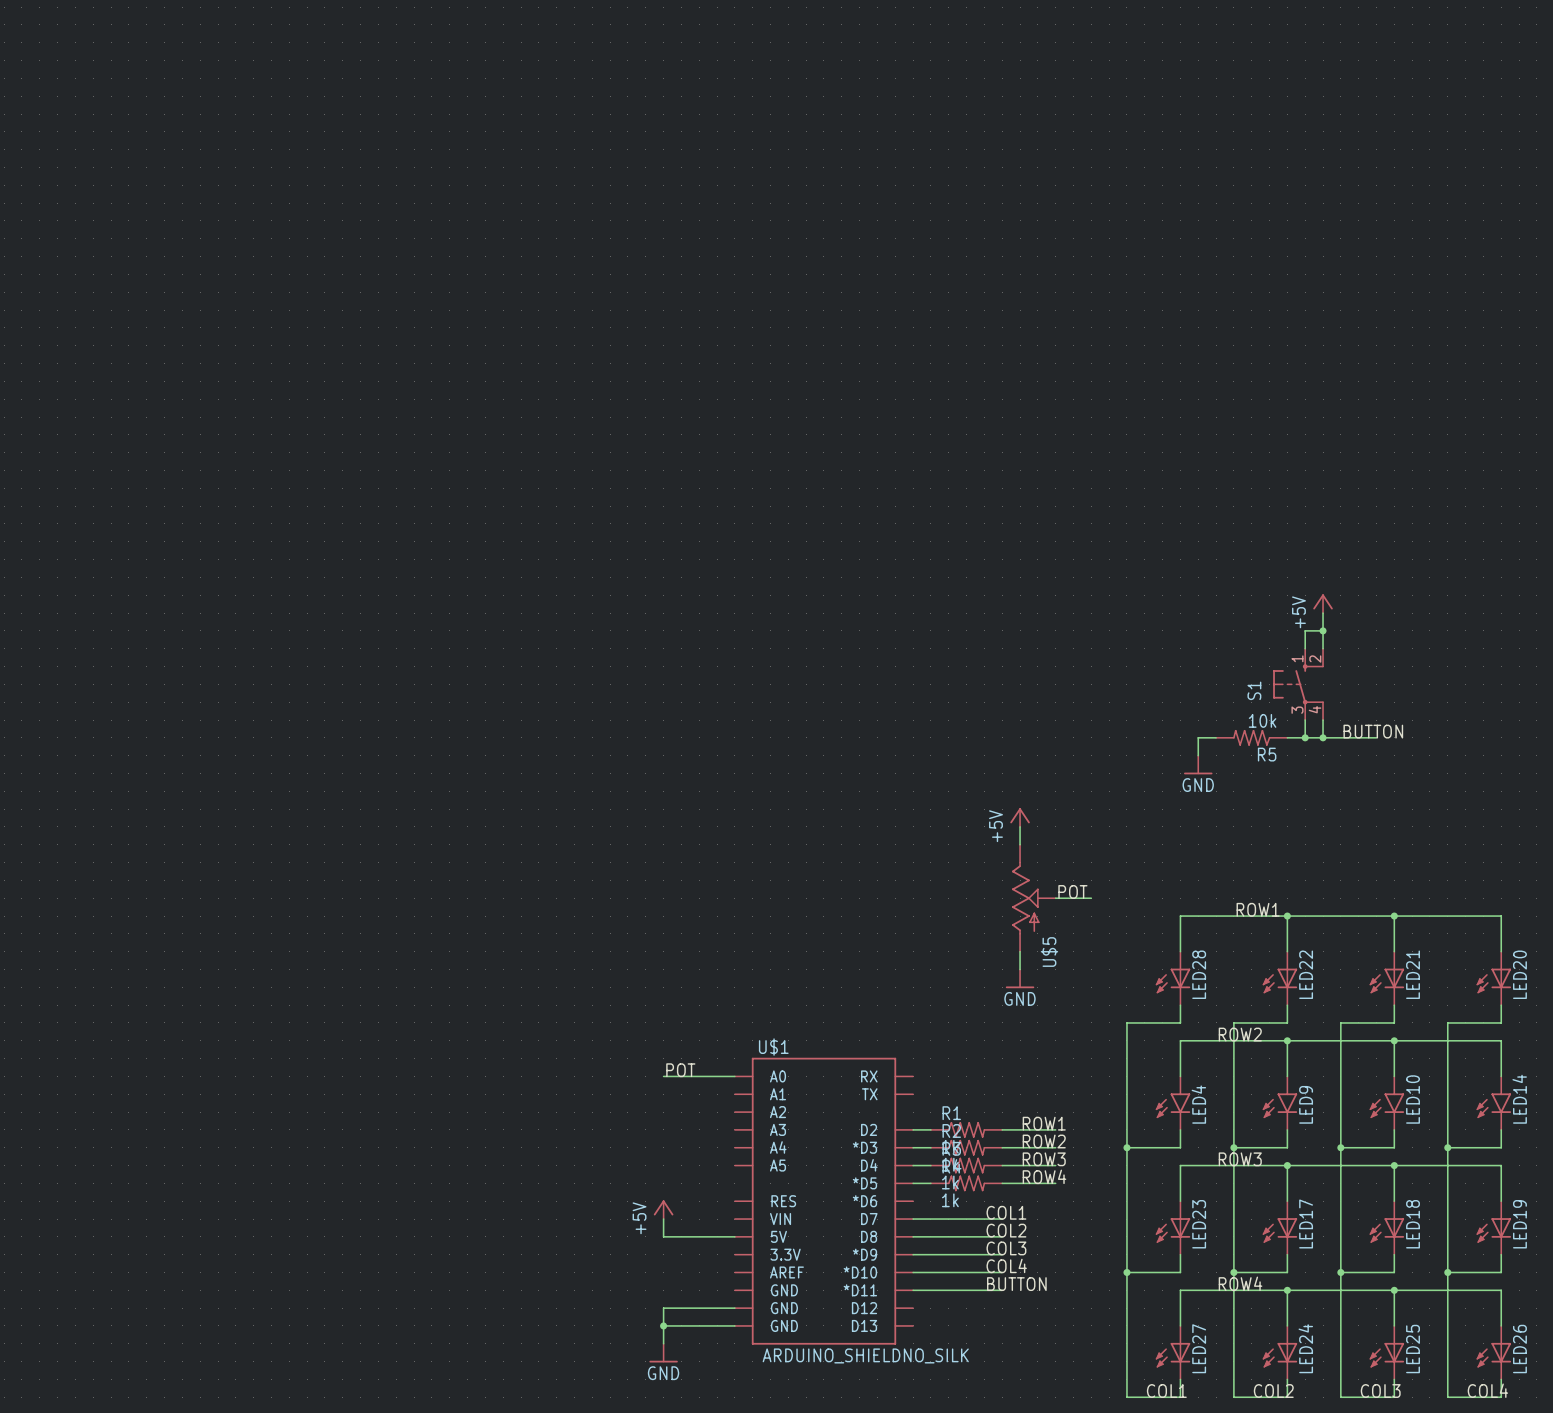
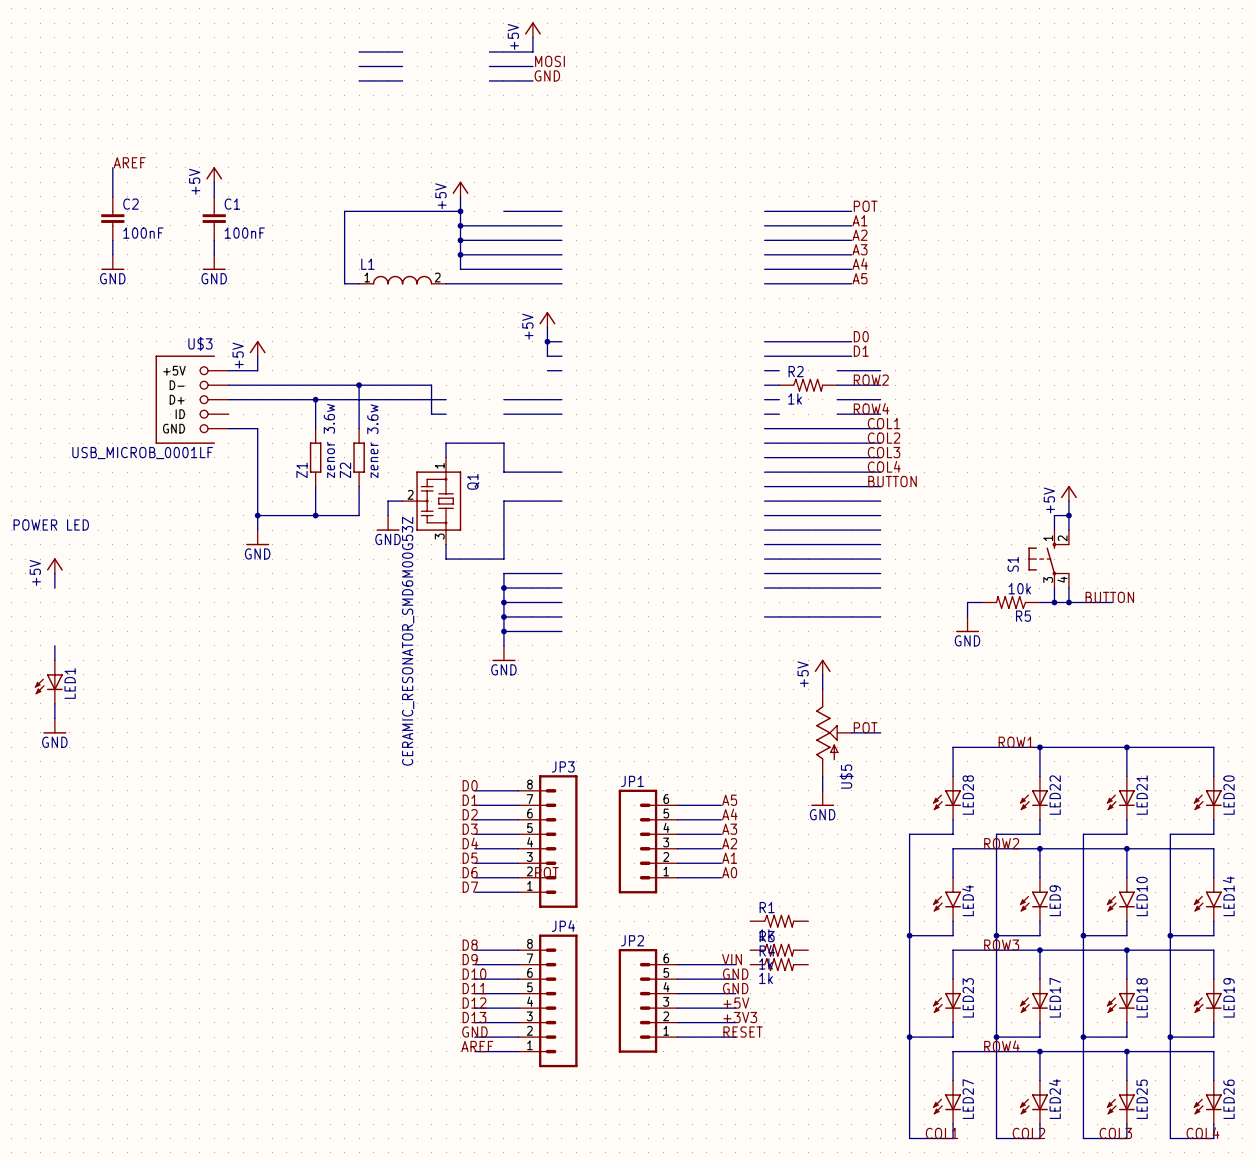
power symbol: none -> +5V (532, 29)
wire: none -> (532, 37) (532, 52) (489, 52)
wire: none -> (359, 52) (402, 52)
label: none -> MOSI (549, 61)
wire: none -> (359, 66) (402, 66)
wire: none -> (489, 66) (532, 66)
label: none -> GND (547, 75)
wire: none -> (359, 80) (402, 80)
wire: none -> (489, 80) (532, 80)
label: none -> AREF (129, 162)
wire: none -> (112, 167) (112, 196)
power symbol: none -> +5V (214, 174)
wire: none -> (214, 182) (214, 196)
power symbol: none -> +5V (460, 189)
wire: none -> (460, 196) (460, 269) (561, 269)
label: none -> POT (865, 206)
wire: none -> (460, 211) (344, 211) (344, 283) (359, 283)
junction: none -> (460, 211)
wire: none -> (503, 211) (561, 211)
wire: none -> (764, 211) (851, 211)
C2: none -> 100nF (112, 218)
C1: none -> 100nF (214, 218)
label: none -> A1 (860, 220)
wire: none -> (460, 225) (561, 225)
junction: none -> (460, 225)
wire: none -> (764, 225) (851, 225)
label: none -> A2 (860, 235)
wire: none -> (112, 240) (112, 254)
wire: none -> (214, 240) (214, 254)
wire: none -> (460, 240) (561, 240)
junction: none -> (460, 240)
wire: none -> (764, 240) (851, 240)
label: none -> A3 (860, 249)
wire: none -> (460, 254) (561, 254)
junction: none -> (460, 254)
wire: none -> (764, 254) (851, 254)
power symbol: none -> GND (112, 262)
power symbol: none -> GND (214, 262)
label: none -> A4 (860, 263)
wire: none -> (764, 269) (851, 269)
label: none -> A5 (860, 278)
L1: none -> (402, 280)
wire: none -> (446, 283) (561, 283)
wire: none -> (764, 283) (851, 283)
power symbol: none -> +5V (547, 319)
wire: none -> (547, 327) (547, 356) (561, 356)
label: none -> D0 (861, 336)
wire: none -> (547, 341) (561, 341)
junction: none -> (547, 341)
wire: none -> (764, 341) (851, 341)
power symbol: none -> +5V (257, 348)
label: none -> D1 (861, 351)
wire: none -> (257, 356) (257, 370) (228, 370)
wire: none -> (764, 356) (851, 356)
wire: none -> (547, 370) (561, 370)
wire: none -> (764, 370) (779, 370)
wire: none -> (837, 370) (880, 370)
label: none -> ROW2 (871, 380)
wire: none -> (228, 385) (431, 385) (431, 414) (446, 414)
wire: none -> (359, 385) (359, 428)
junction: none -> (359, 385)
wire: none -> (764, 385) (779, 385)
wire: none -> (837, 385) (880, 385)
U$3: none -> USB_MICROB_0001LF (192, 399)
wire: none -> (228, 399) (446, 399)
wire: none -> (315, 399) (315, 428)
junction: none -> (315, 399)
wire: none -> (503, 399) (561, 399)
wire: none -> (764, 399) (779, 399)
wire: none -> (837, 399) (880, 399)
label: none -> ROW4 (871, 408)
wire: none -> (503, 414) (561, 414)
wire: none -> (764, 414) (779, 414)
wire: none -> (837, 414) (880, 414)
label: none -> COL1 (884, 423)
wire: none -> (228, 428) (257, 428) (257, 530)
wire: none -> (764, 428) (880, 428)
label: none -> COL2 (884, 438)
wire: none -> (764, 443) (880, 443)
label: none -> COL3 (884, 452)
Z1: none -> zenor 3.6w (315, 457)
Z2: none -> zener 3.6w (359, 457)
wire: none -> (446, 457) (446, 443) (503, 443) (503, 472) (561, 472)
wire: none -> (764, 457) (880, 457)
label: none -> COL4 (884, 466)
wire: none -> (764, 472) (880, 472)
label: none -> BUTTON (892, 481)
wire: none -> (315, 486) (315, 515)
wire: none -> (359, 486) (359, 515) (257, 515)
wire: none -> (764, 486) (880, 486)
wire: none -> (402, 501) (388, 501) (388, 515)
Q1: none -> CERAMIC_RESONATOR_SMD6M00G53Z (431, 501)
wire: none -> (561, 501) (503, 501) (503, 559) (446, 559) (446, 544)
wire: none -> (764, 501) (880, 501)
junction: none -> (257, 515)
junction: none -> (315, 515)
wire: none -> (764, 515) (880, 515)
power symbol: none -> GND (388, 523)
text: none -> POWER LED (51, 524)
wire: none -> (764, 530) (880, 530)
power symbol: none -> GND (257, 537)
wire: none -> (764, 544) (880, 544)
wire: none -> (764, 559) (880, 559)
power symbol: none -> +5V (54, 565)
wire: none -> (54, 573) (54, 588)
wire: none -> (561, 573) (503, 573) (503, 645)
wire: none -> (764, 573) (880, 573)
wire: none -> (503, 588) (561, 588)
junction: none -> (503, 588)
wire: none -> (764, 588) (880, 588)
wire: none -> (503, 602) (561, 602)
junction: none -> (503, 602)
wire: none -> (503, 616) (561, 616)
junction: none -> (503, 616)
wire: none -> (764, 616) (880, 616)
wire: none -> (503, 631) (561, 631)
junction: none -> (503, 631)
wire: none -> (54, 645) (54, 660)
power symbol: none -> GND (503, 653)
LED1: none -> (48, 682)
wire: none -> (54, 703) (54, 718)
power symbol: none -> GND (54, 725)
label: none -> D0 (470, 785)
wire: none -> (474, 790) (518, 790)
label: none -> D1 (470, 800)
label: none -> A5 (729, 800)
wire: none -> (474, 805) (518, 805)
wire: none -> (677, 805) (721, 805)
label: none -> D2 (470, 814)
label: none -> A4 (729, 814)
wire: none -> (474, 819) (518, 819)
wire: none -> (677, 819) (721, 819)
label: none -> D3 (470, 829)
label: none -> A3 (729, 829)
wire: none -> (474, 834) (518, 834)
wire: none -> (677, 834) (721, 834)
JP3: none -> (548, 841)
JP1: none -> (648, 841)
label: none -> D4 (470, 843)
label: none -> A2 (729, 843)
wire: none -> (474, 848) (518, 848)
wire: none -> (677, 848) (721, 848)
label: none -> D5 (470, 858)
label: none -> A1 (729, 858)
wire: none -> (474, 863) (518, 863)
label: none -> D6 (470, 872)
label: none -> A0 (729, 872)
wire: none -> (474, 877) (518, 877)
wire: (663, 1076) (734, 1076) -> none
label: none -> D7 (470, 887)
wire: none -> (474, 892) (518, 892)
label: ROW1 (1044, 1123) -> none
wire: (913, 1129) (930, 1129) -> none
wire: (1002, 1129) (1055, 1129) -> (677, 877) (721, 877)
label: ROW2 (1044, 1141) -> none
wire: (913, 1147) (930, 1147) -> none
R2 position: (966, 1147) -> (808, 385)
wire: (1002, 1147) (1055, 1147) -> none
label: none -> D8 (470, 945)
label: ROW3 (1044, 1159) -> none
wire: none -> (474, 950) (518, 950)
wire: (913, 1165) (930, 1165) -> none
wire: (1002, 1165) (1055, 1165) -> none
label: ROW4 (1044, 1176) -> none
label: none -> D9 (470, 959)
label: none -> VIN (732, 959)
wire: none -> (474, 964) (518, 964)
wire: (913, 1183) (930, 1183) -> (735, 964) (677, 964)
wire: (1002, 1183) (1055, 1183) -> none
label: none -> D10 (474, 974)
label: none -> GND (735, 974)
wire: none -> (474, 979) (518, 979)
U$1: ARDUINO_SHIELDNO_SILK (823, 1201) -> none
wire: none -> (677, 979) (735, 979)
power symbol: +5V (663, 1209) -> none
label: none -> D11 (474, 988)
label: none -> GND (735, 988)
label: COL1 (1006, 1212) -> none
wire: none -> (474, 993) (518, 993)
wire: (663, 1219) (663, 1236) (734, 1236) -> none
wire: (913, 1219) (1002, 1219) -> (735, 993) (677, 993)
JP4: none -> (548, 1000)
JP2: none -> (648, 1000)
label: none -> D12 (474, 1003)
label: none -> +5V (736, 1003)
label: COL2 (1006, 1230) -> none
wire: none -> (474, 1008) (518, 1008)
wire: (913, 1236) (1002, 1236) -> (735, 1008) (677, 1008)
label: none -> D13 (474, 1017)
label: none -> +3V3 (740, 1017)
label: COL3 (1006, 1248) -> none
wire: none -> (474, 1022) (518, 1022)
wire: (913, 1254) (1002, 1254) -> (735, 1022) (677, 1022)
label: COL4 (1006, 1265) -> none
label: none -> GND (474, 1032)
label: none -> RESET (743, 1032)
wire: none -> (474, 1037) (518, 1037)
wire: (913, 1272) (1002, 1272) -> (735, 1037) (677, 1037)
label: none -> AREF (477, 1046)
label: BUTTON (1016, 1284) -> none
wire: none -> (474, 1051) (518, 1051)
wire: (913, 1290) (1002, 1290) -> none
wire: (734, 1308) (663, 1308) (663, 1343) -> none
wire: (663, 1325) (734, 1325) -> none
junction: (663, 1325) -> none
power symbol: GND (663, 1353) -> none

